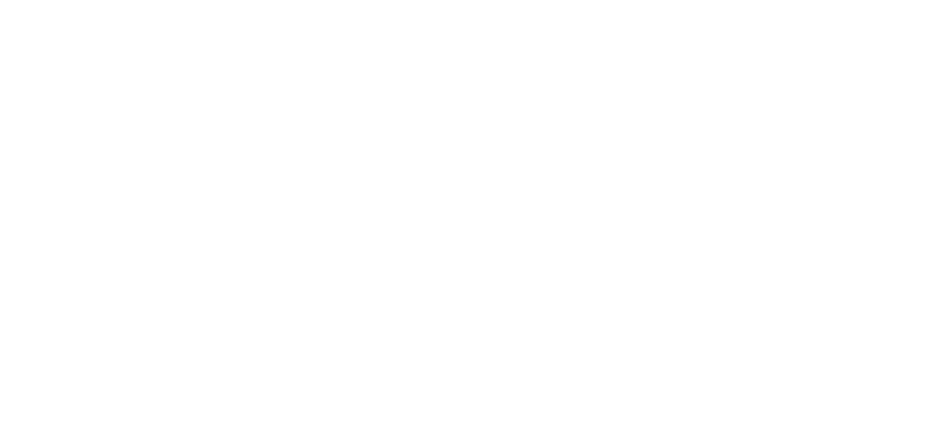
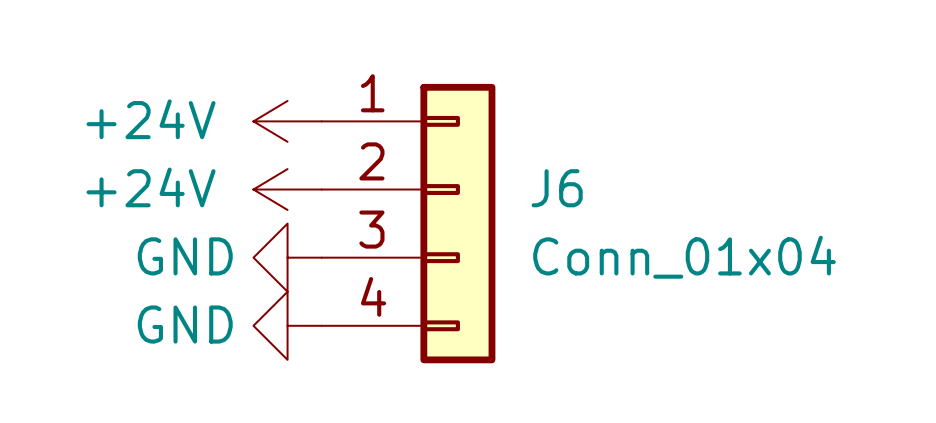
power symbol: none -> +24V (287, 121)
power symbol: none -> +24V (287, 189)
J6: none -> Conn_01x04 (408, 223)
power symbol: none -> GND (287, 257)
power symbol: none -> GND (287, 325)

